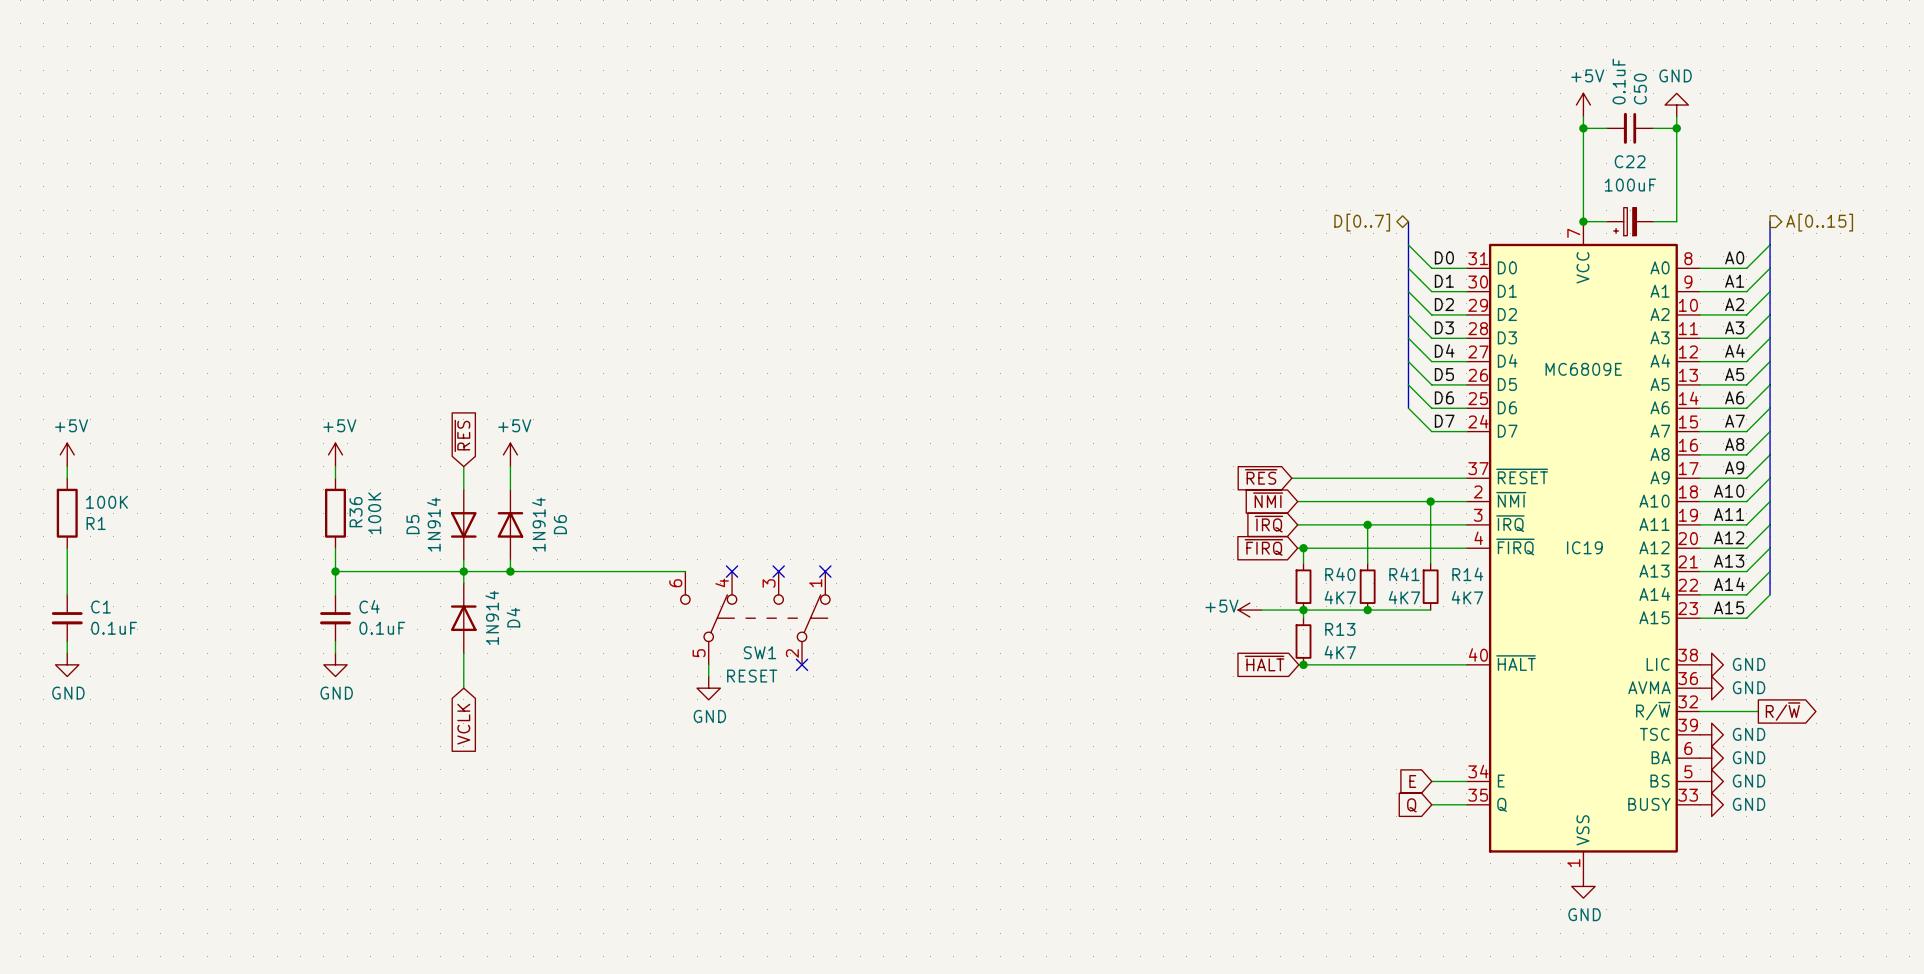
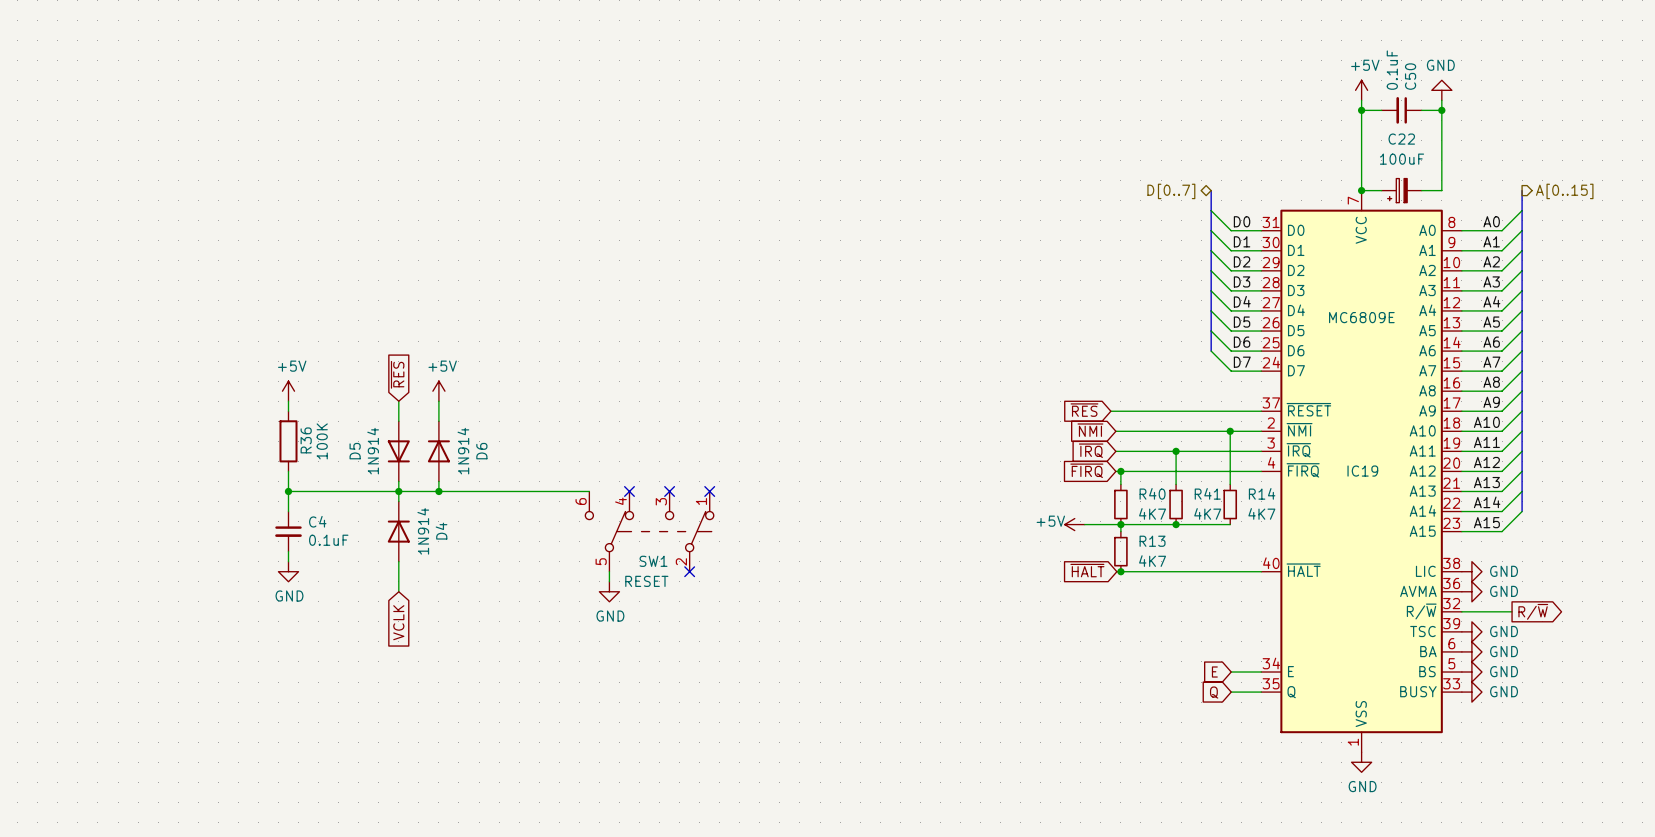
power symbol: +5V (67, 454) -> none
wire: (67, 466) (67, 478) -> none
R1: 100K (67, 513) -> none
wire: (67, 548) (67, 594) -> none
C1: 0.1uF (67, 618) -> none
wire: (67, 641) (67, 653) -> none
power symbol: GND (67, 664) -> none

